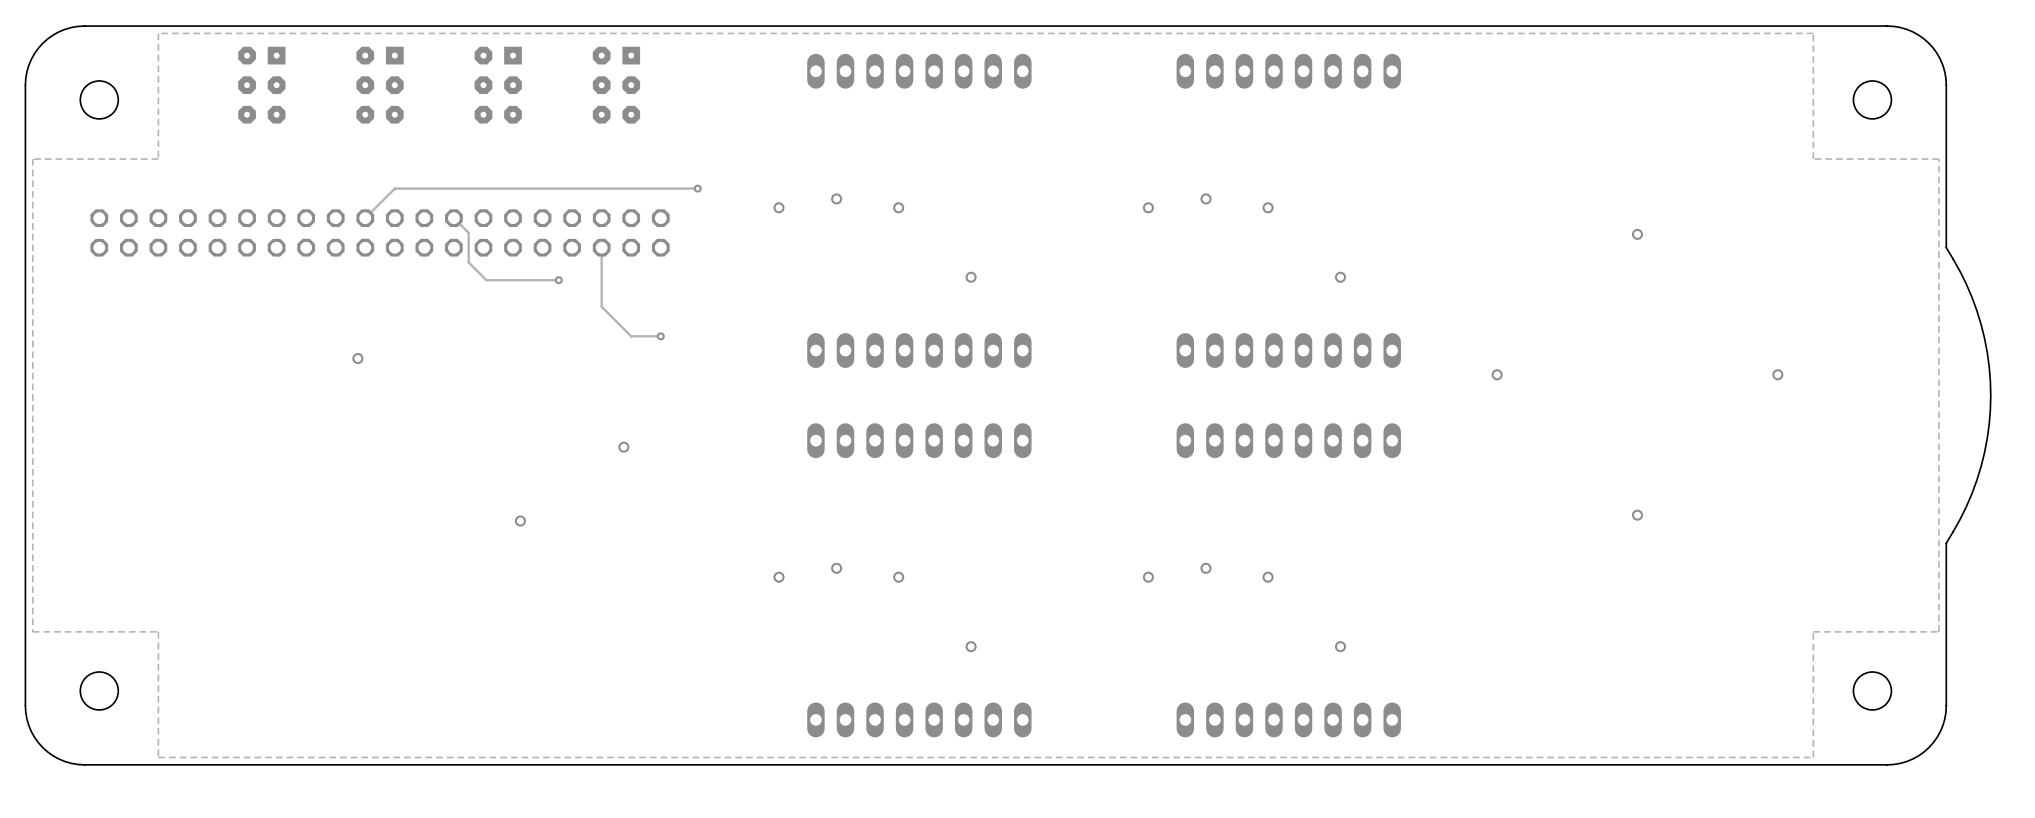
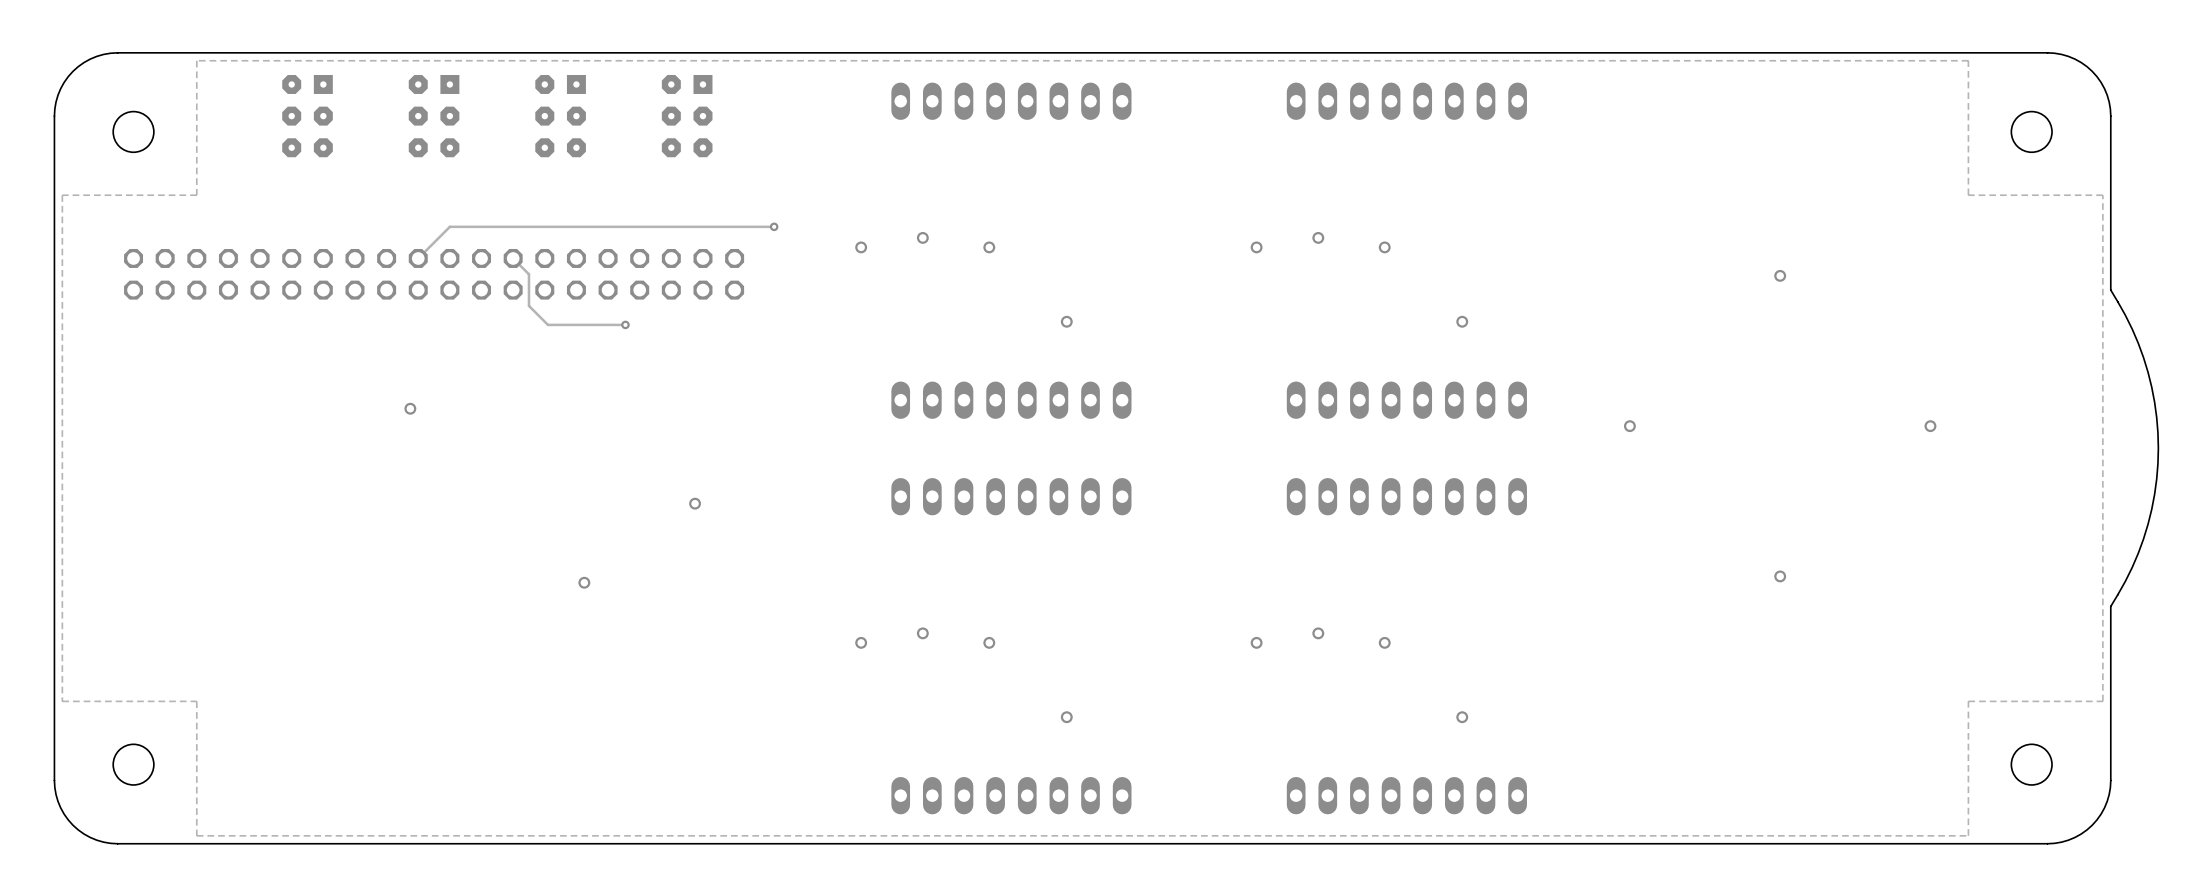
track: (601, 247) (601, 306) (631, 336) (660, 336) -> none
via: (660, 336) -> none

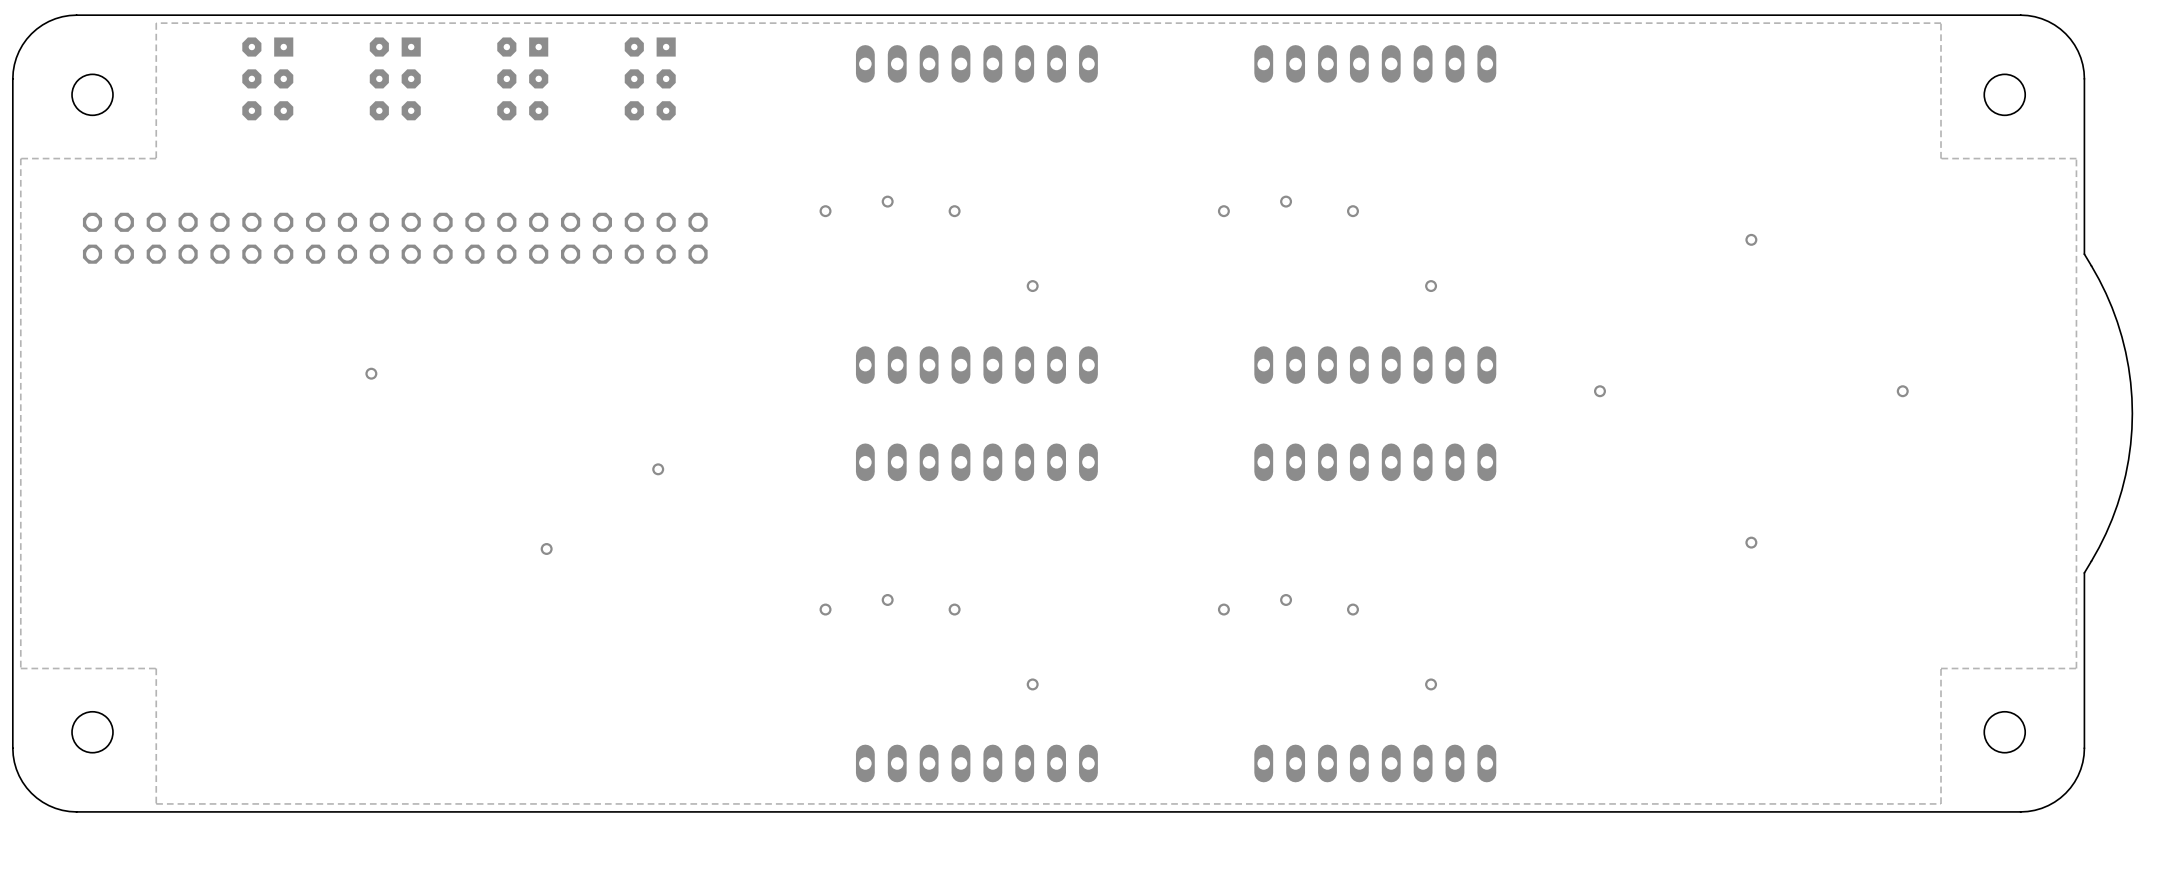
track: (774, 226) (449, 226) (418, 258) -> none
via: (774, 226) -> none
track: (513, 258) (528, 274) (528, 305) (547, 324) (625, 324) -> none
via: (625, 324) -> none

